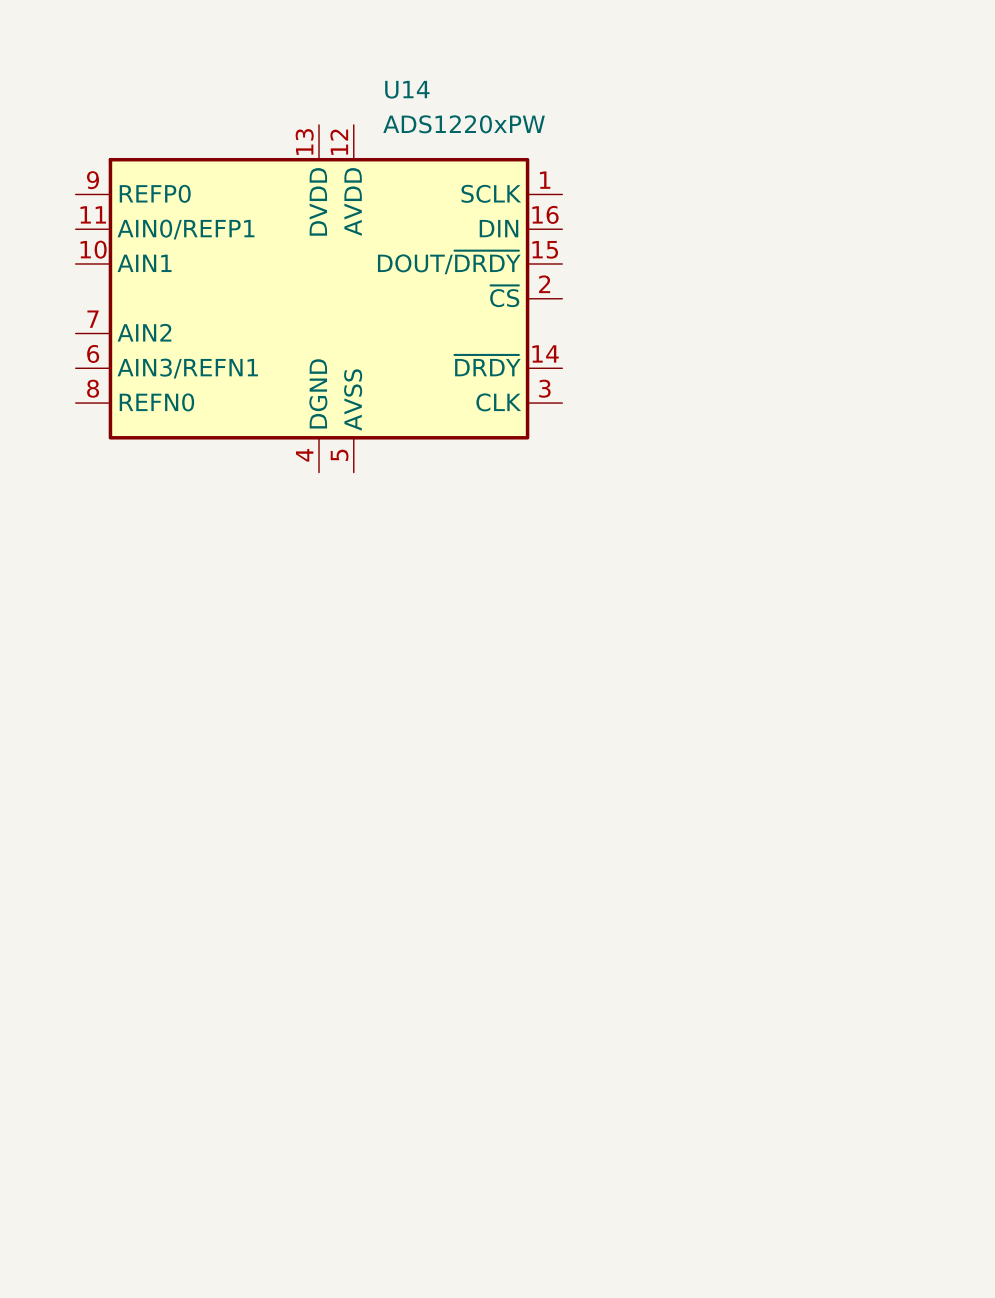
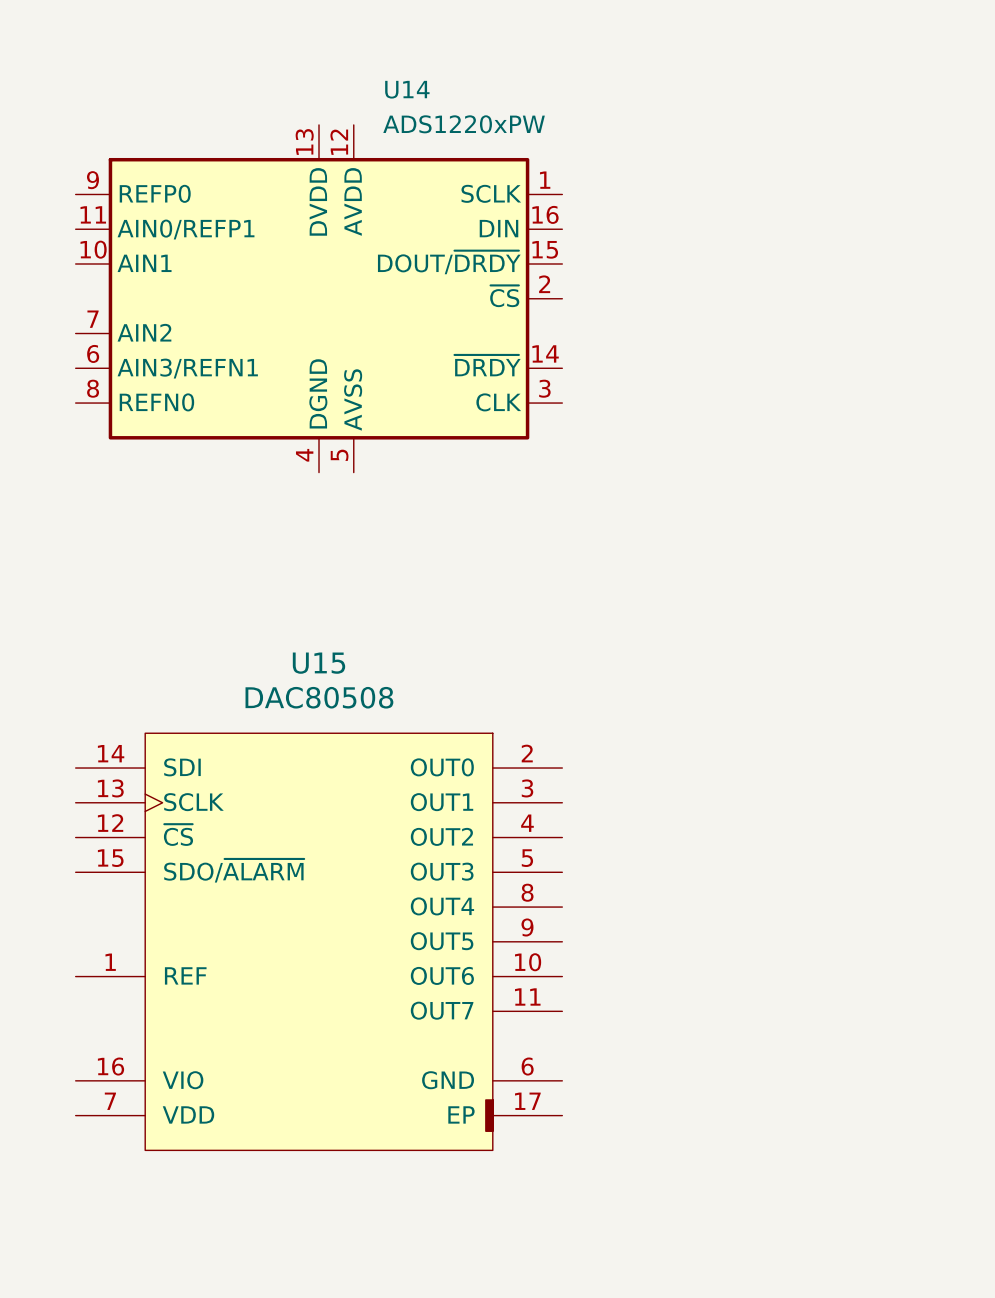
U15: none -> DAC80508 (319, 941)

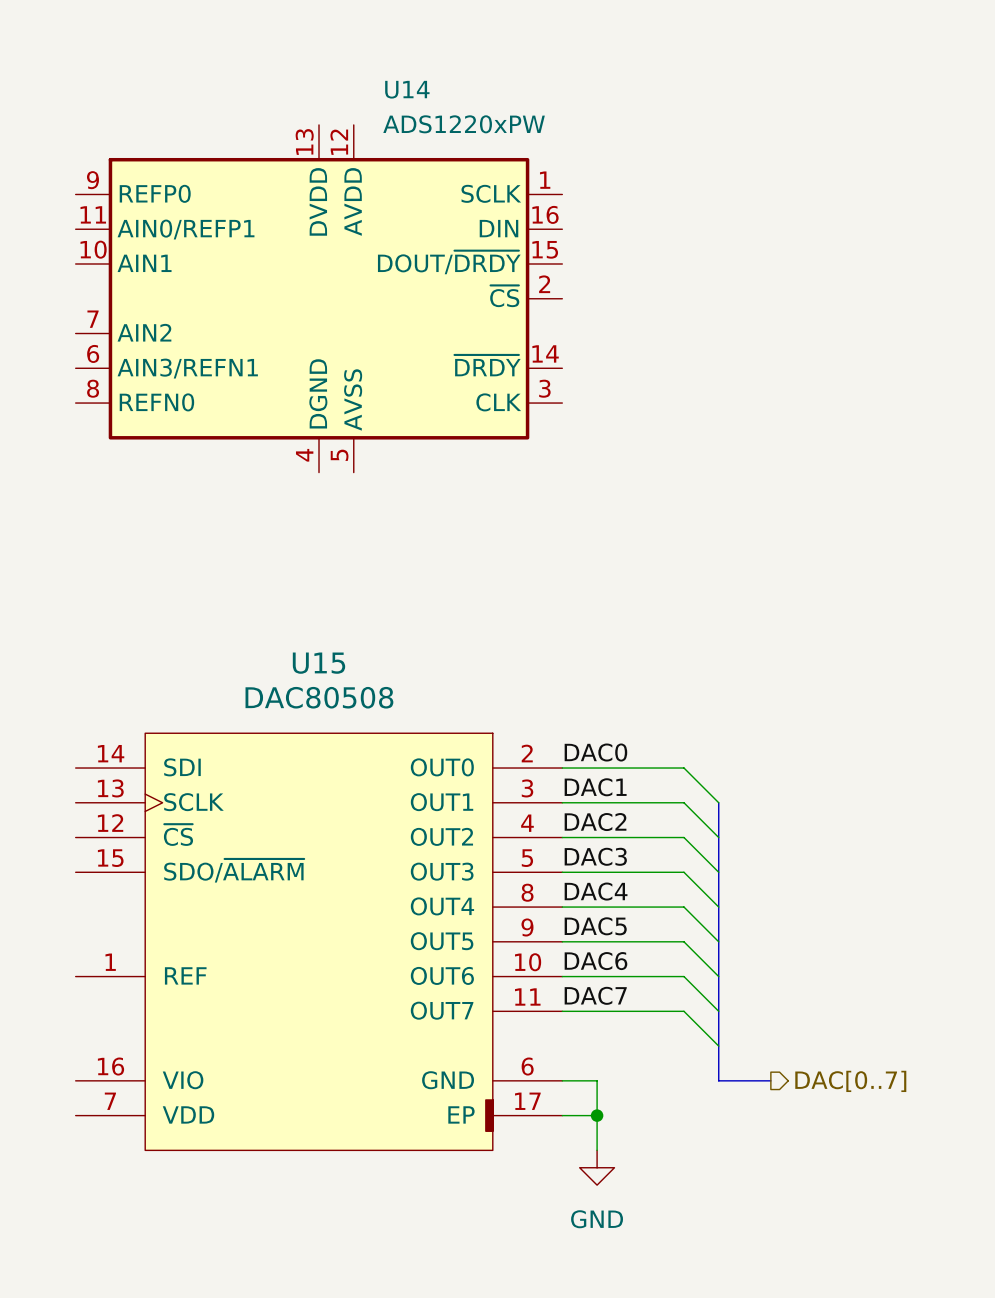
label: none -> DAC0 (595, 752)
wire: none -> (562, 768) (683, 768) (718, 802)
label: none -> DAC1 (595, 787)
wire: none -> (562, 802) (683, 802) (718, 837)
bus: none -> (718, 802) (718, 1080) (770, 1080)
label: none -> DAC2 (595, 822)
wire: none -> (562, 837) (683, 837) (718, 872)
label: none -> DAC3 (595, 856)
wire: none -> (562, 872) (683, 872) (718, 907)
label: none -> DAC4 (596, 891)
wire: none -> (562, 907) (683, 907) (718, 941)
label: none -> DAC5 (595, 926)
wire: none -> (562, 941) (683, 941) (718, 976)
label: none -> DAC6 (595, 961)
wire: none -> (562, 976) (683, 976) (718, 1011)
label: none -> DAC7 (595, 995)
wire: none -> (562, 1011) (683, 1011) (718, 1046)
wire: none -> (562, 1080) (597, 1080) (597, 1150)
hierarchical label: none -> DAC[0..7] (850, 1081)
wire: none -> (562, 1115) (597, 1115)
junction: none -> (597, 1115)
power symbol: none -> GND (597, 1167)

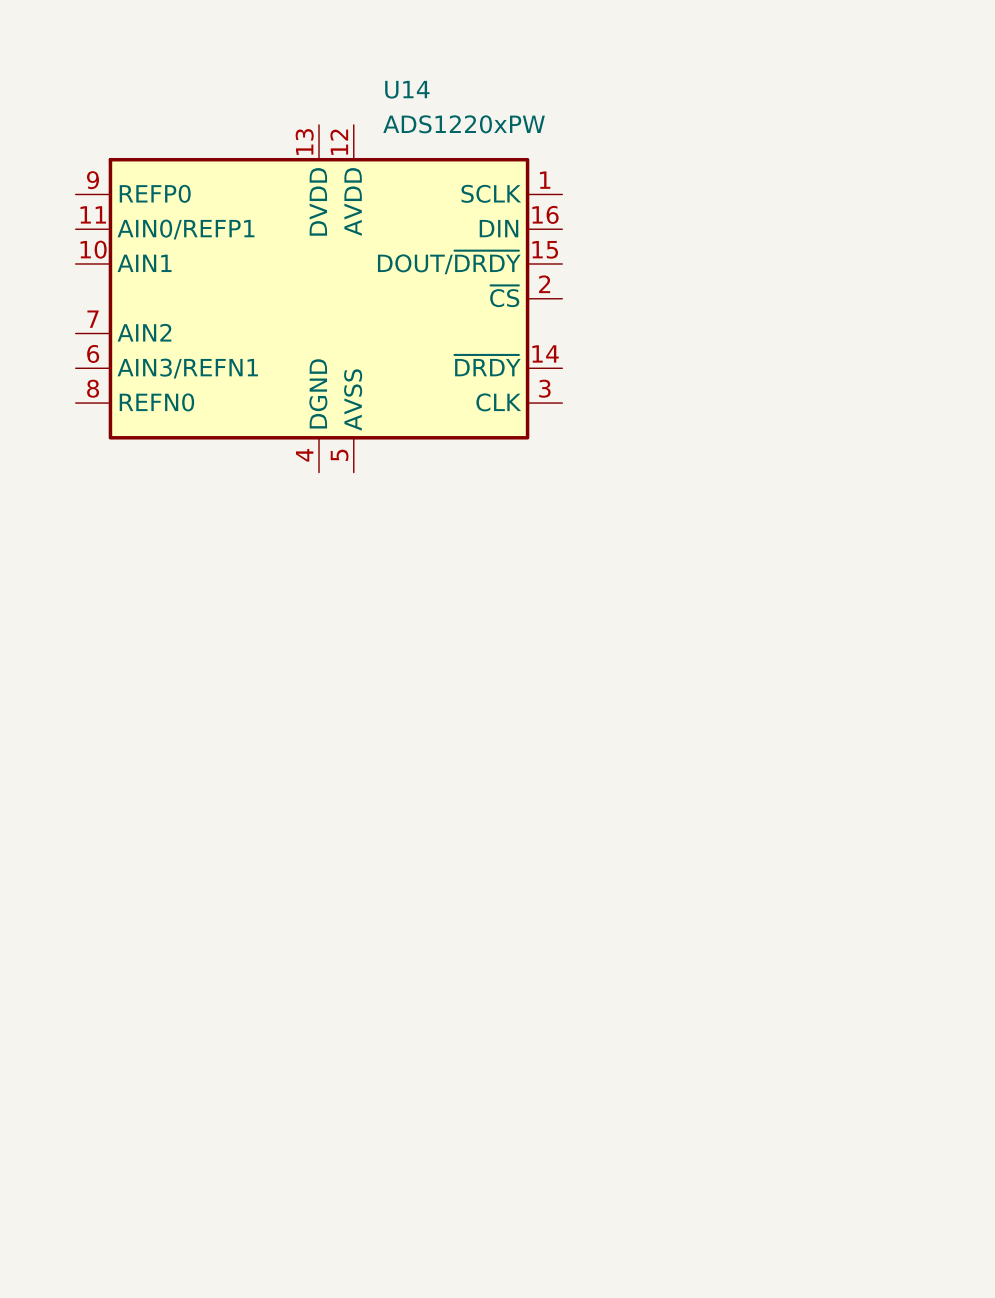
label: DAC0 (595, 752) -> none
wire: (562, 768) (683, 768) (718, 802) -> none
label: DAC1 (595, 787) -> none
wire: (562, 802) (683, 802) (718, 837) -> none
bus: (718, 802) (718, 1080) (770, 1080) -> none
label: DAC2 (595, 822) -> none
wire: (562, 837) (683, 837) (718, 872) -> none
label: DAC3 (595, 856) -> none
wire: (562, 872) (683, 872) (718, 907) -> none
label: DAC4 (596, 891) -> none
wire: (562, 907) (683, 907) (718, 941) -> none
label: DAC5 (595, 926) -> none
U15: DAC80508 (319, 941) -> none
wire: (562, 941) (683, 941) (718, 976) -> none
label: DAC6 (595, 961) -> none
wire: (562, 976) (683, 976) (718, 1011) -> none
label: DAC7 (595, 995) -> none
wire: (562, 1011) (683, 1011) (718, 1046) -> none
wire: (562, 1080) (597, 1080) (597, 1150) -> none
hierarchical label: DAC[0..7] (850, 1081) -> none
wire: (562, 1115) (597, 1115) -> none
junction: (597, 1115) -> none
power symbol: GND (597, 1167) -> none

